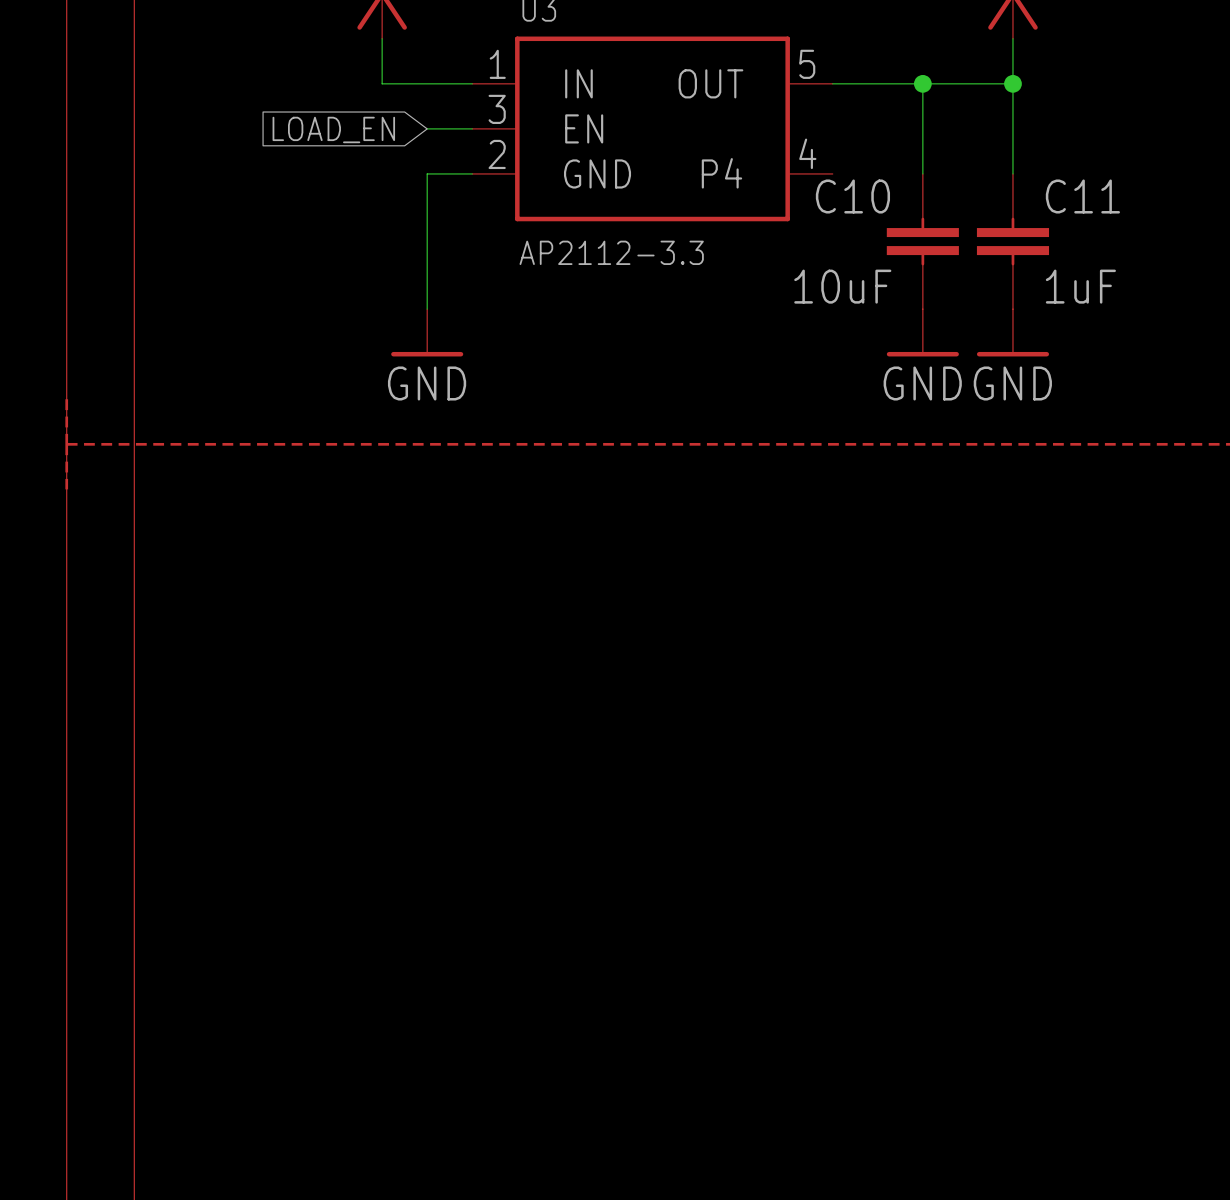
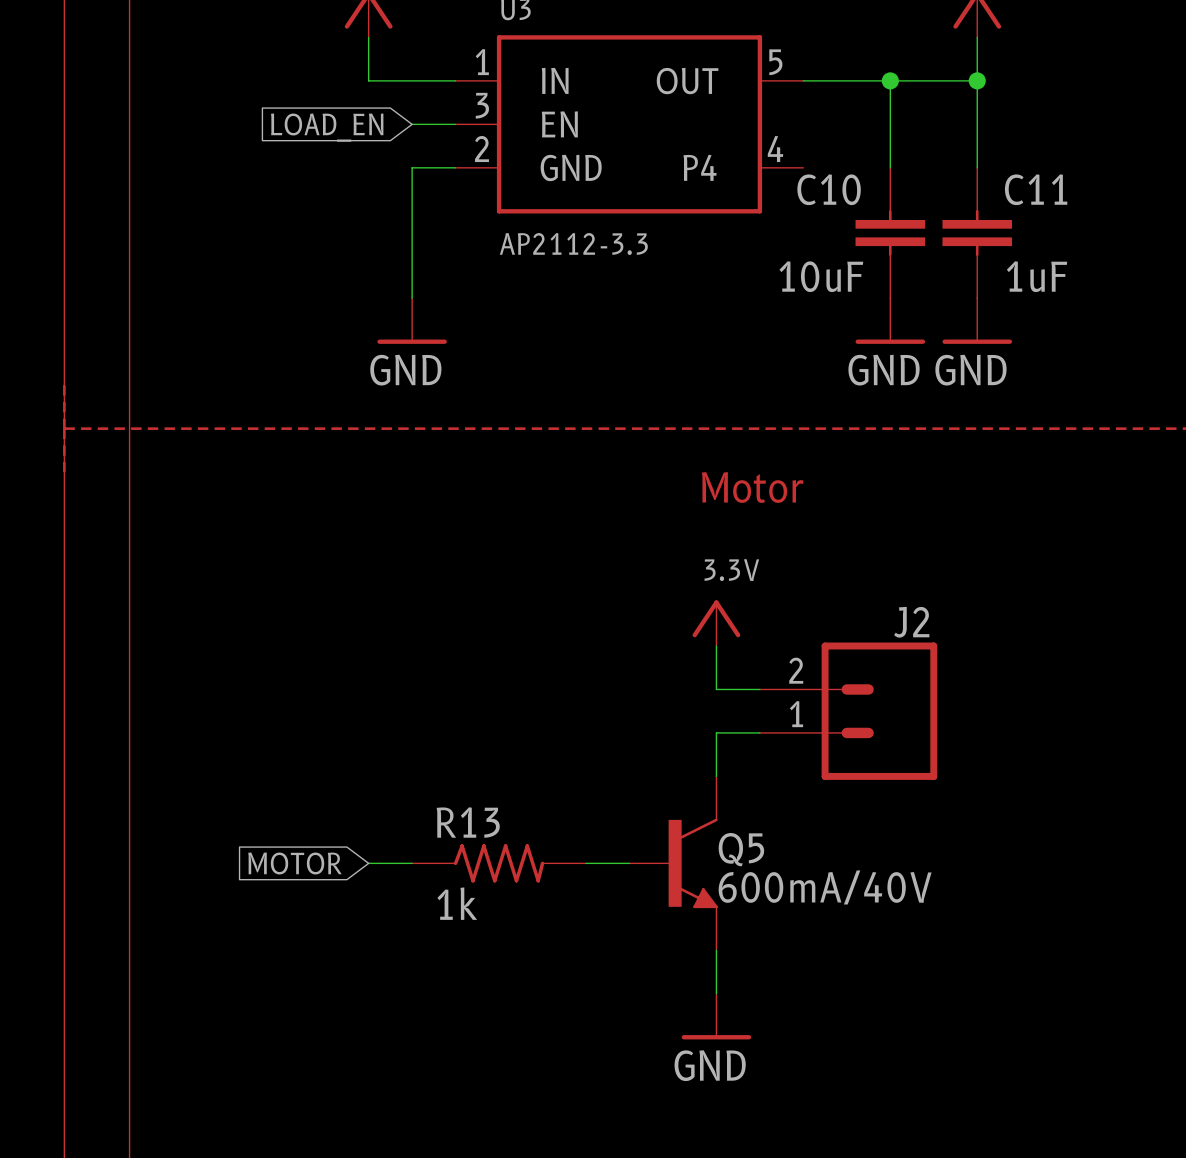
text: none -> Motor (752, 487)
power symbol: none -> 3.3V (716, 623)
wire: none -> (716, 646) (716, 689) (759, 689)
J2: none -> (848, 711)
wire: none -> (759, 732) (716, 732) (716, 776)
global label: none -> MOTOR (294, 863)
wire: none -> (368, 863) (412, 863)
R13: none -> 1k (499, 863)
wire: none -> (586, 863) (629, 863)
Q5: none -> 600mA/40V (673, 863)
wire: none -> (716, 950) (716, 993)
power symbol: none -> GND (716, 1016)

